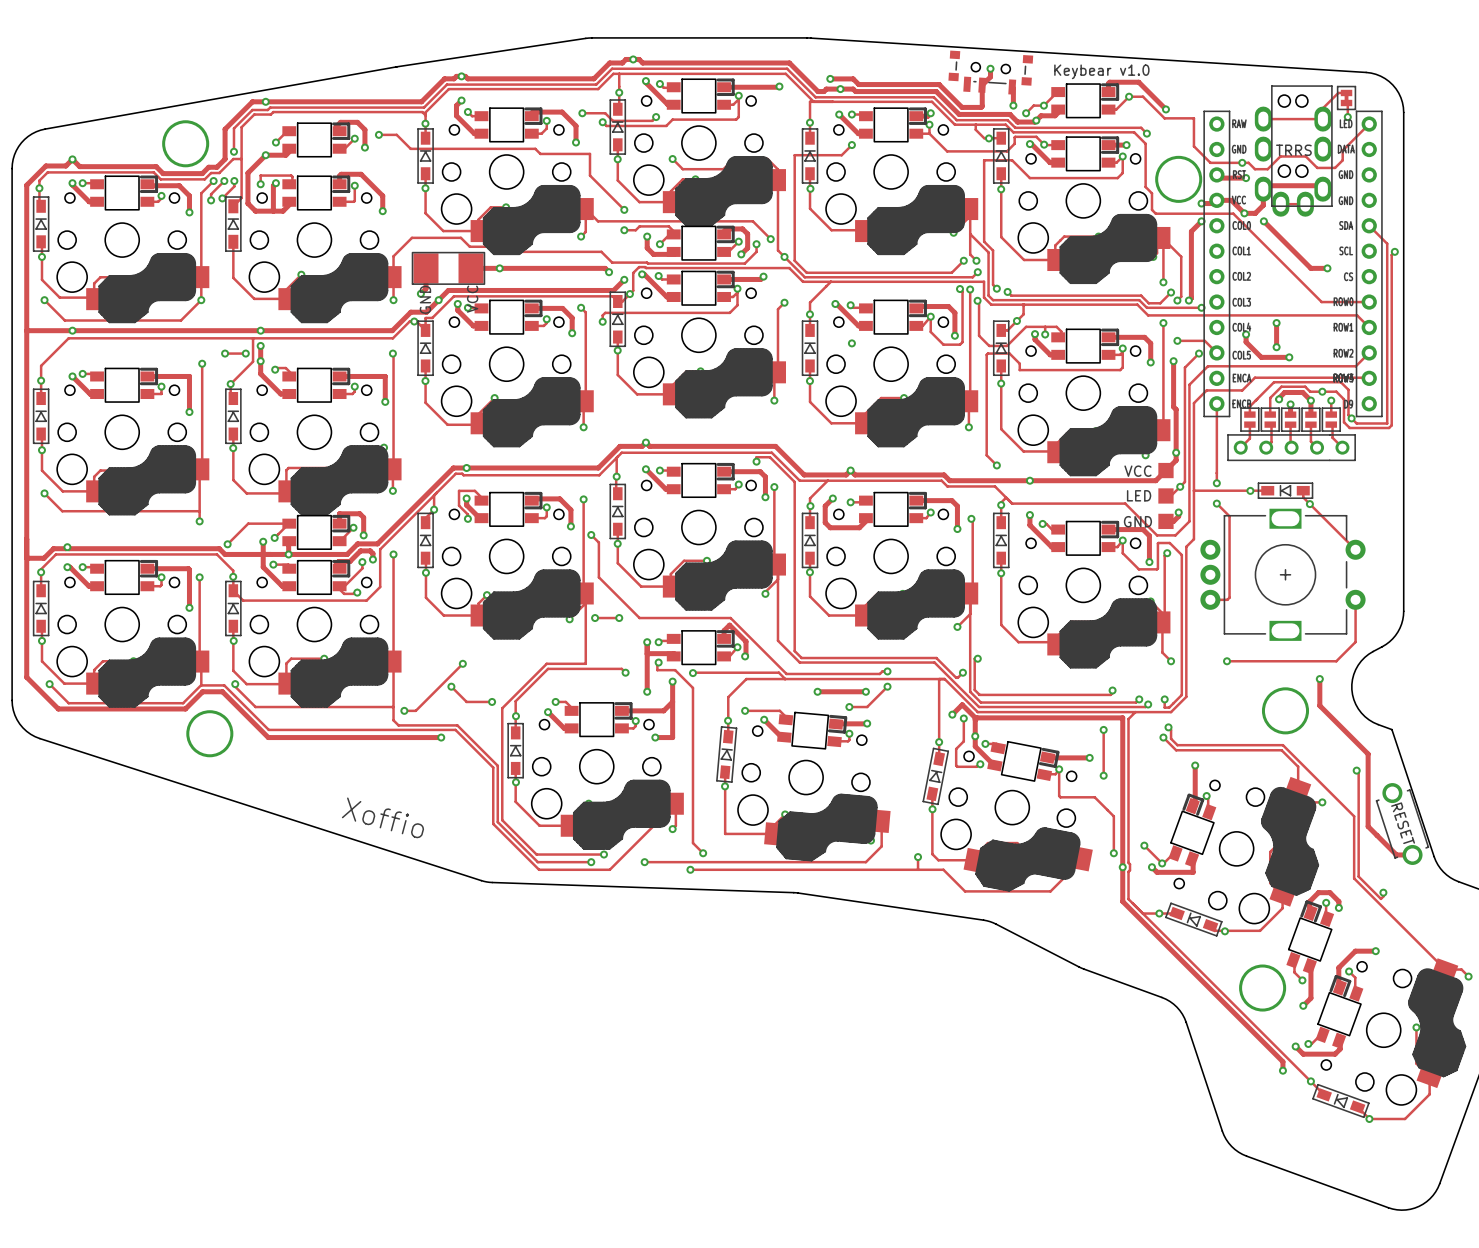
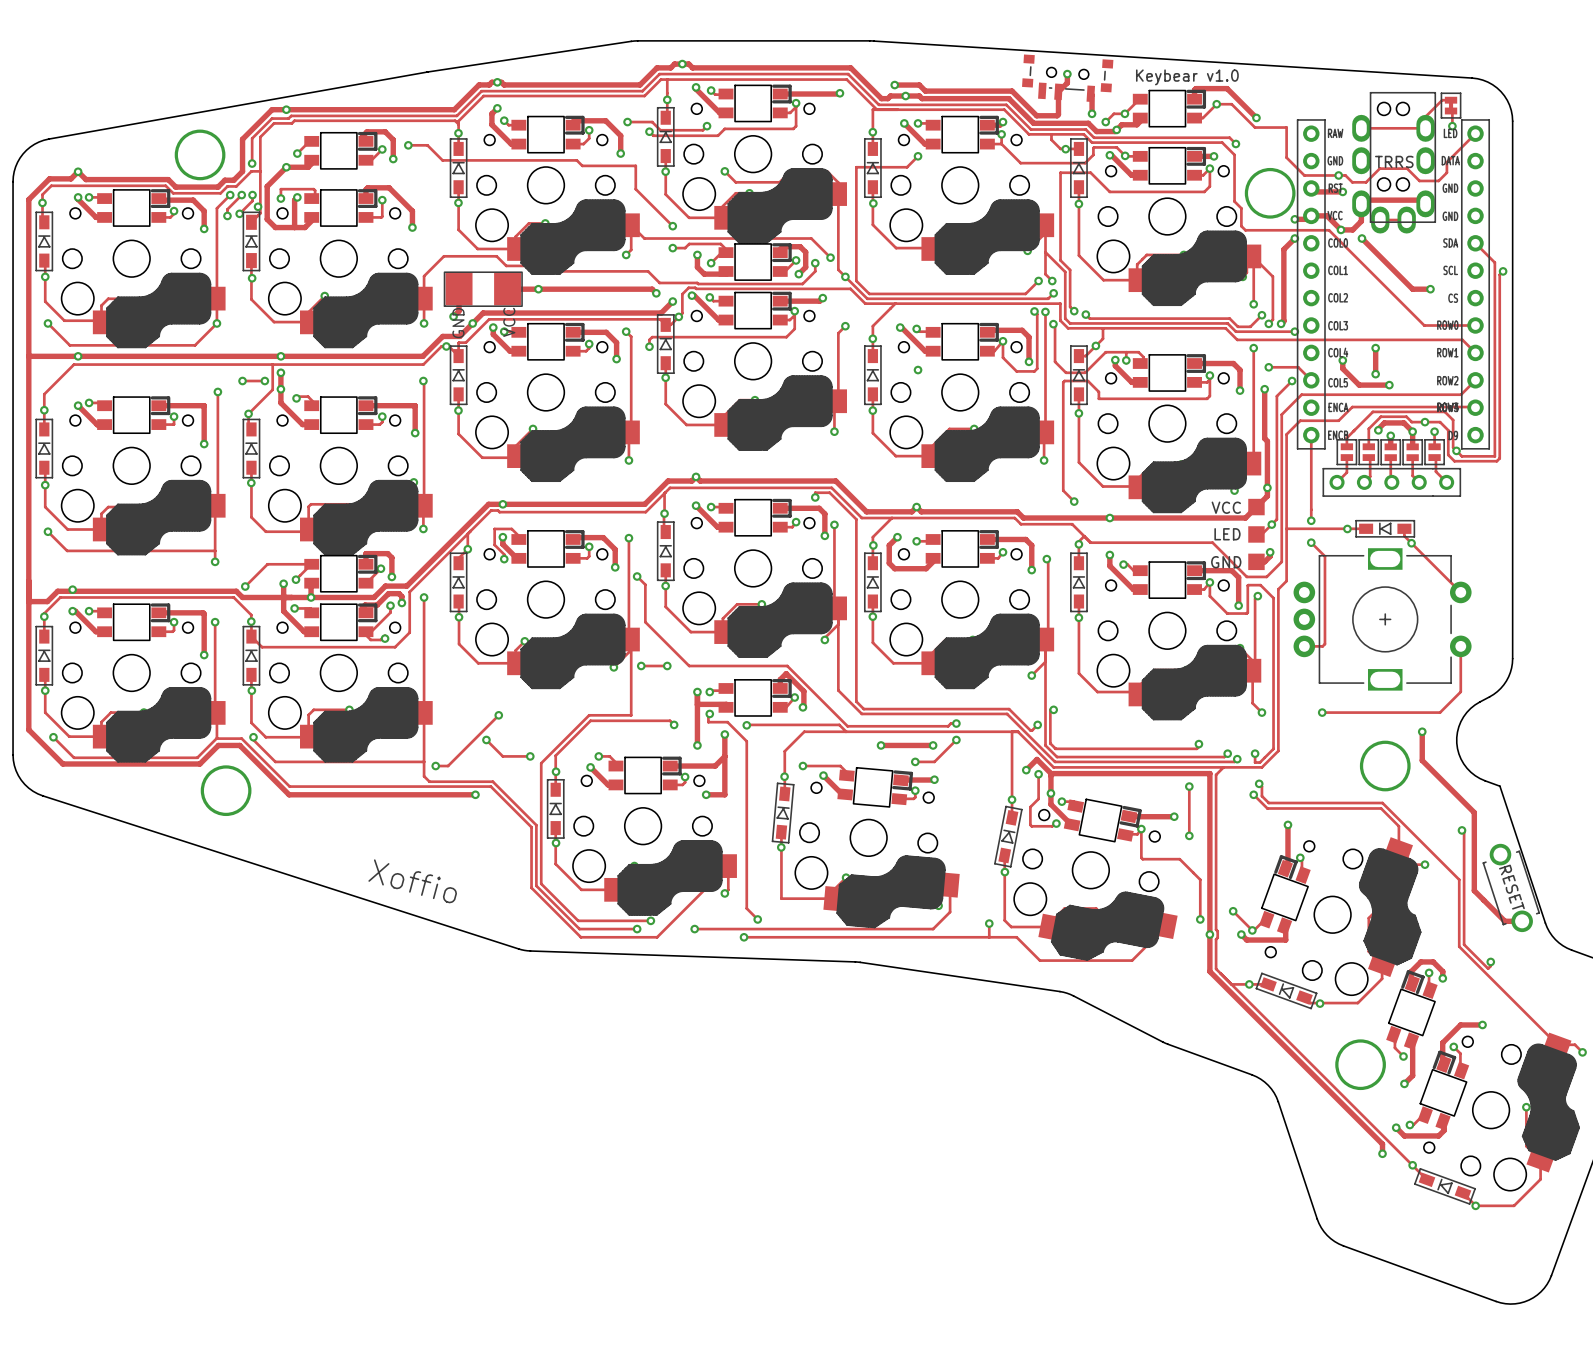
via: none -> (258, 206)
via: none -> (252, 278)

